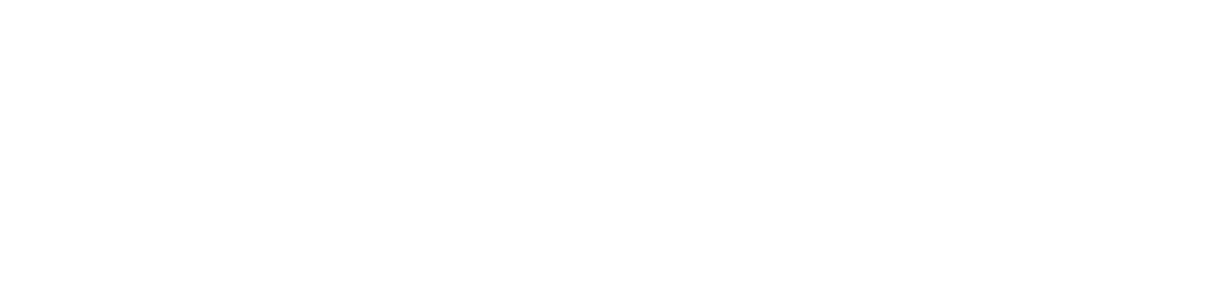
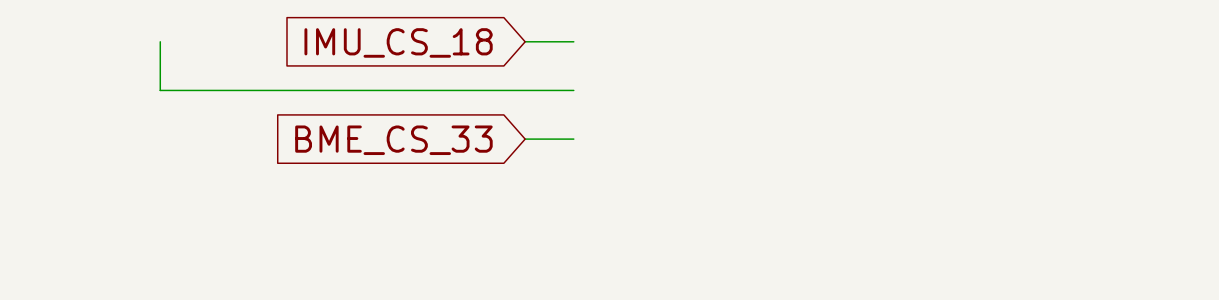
wire: none -> (160, 41) (160, 90) (573, 90)
wire: none -> (525, 41) (573, 41)
global label: none -> IMU_CS_18 (398, 42)
wire: none -> (525, 139) (573, 139)
global label: none -> BME_CS_33 (393, 140)

